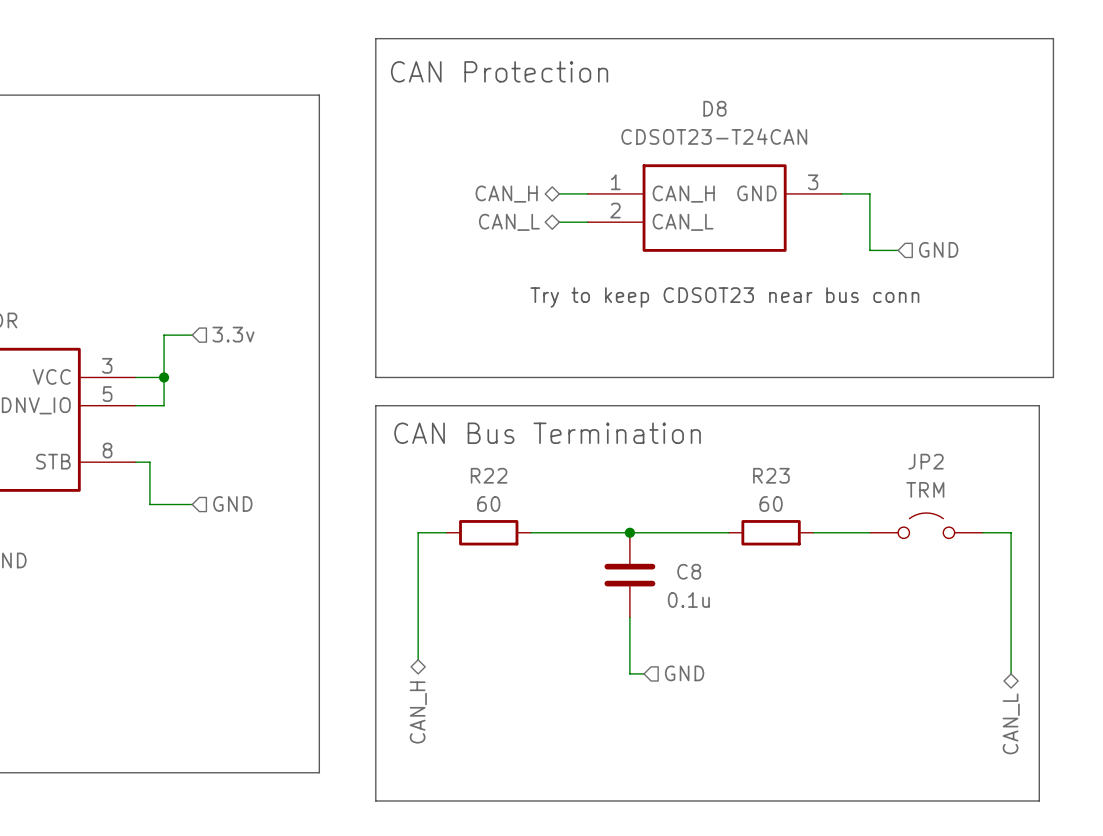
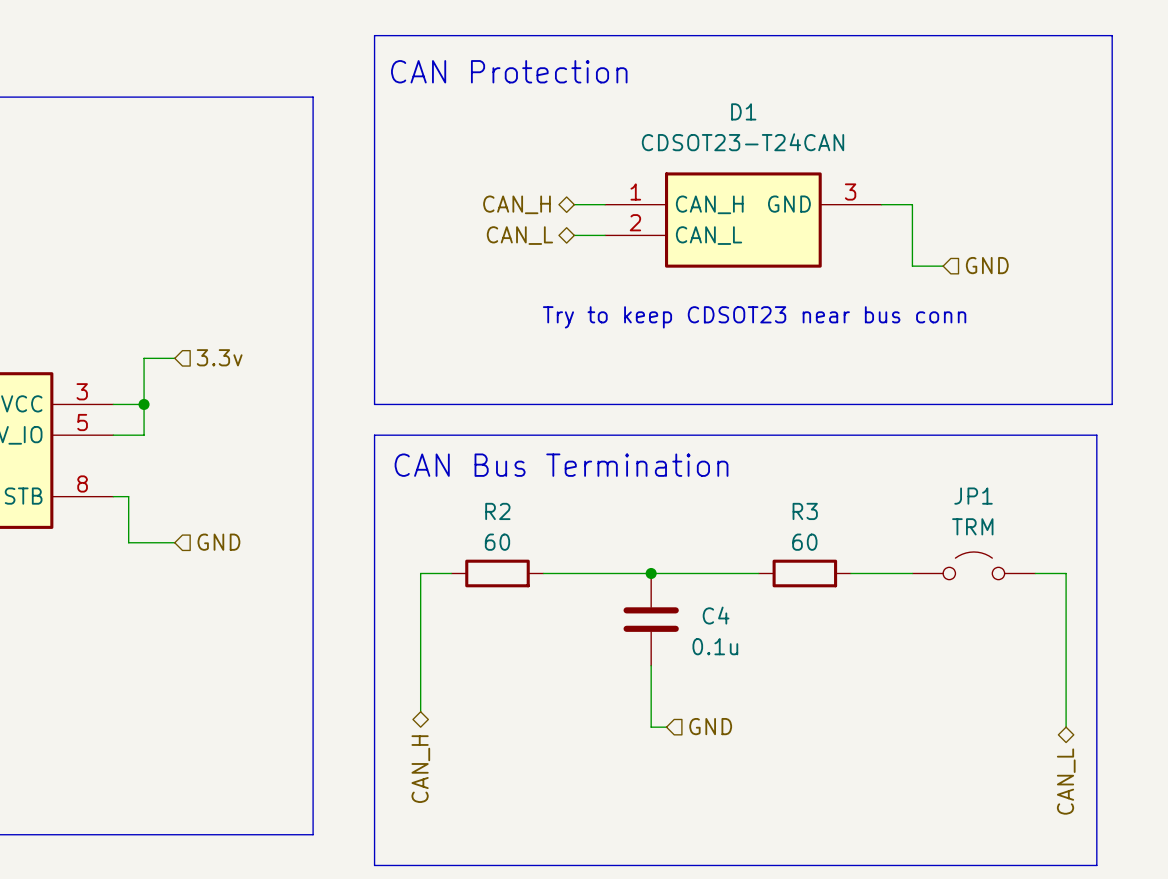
D8 name: D8 (714, 108) -> D1 (743, 111)
JP2 name: JP2 (926, 461) -> JP1 (973, 496)
R22 name: R22 (489, 475) -> R2 (497, 511)
R23 name: R23 (771, 475) -> R3 (805, 511)
C8 name: C8 (689, 571) -> C4 (716, 615)

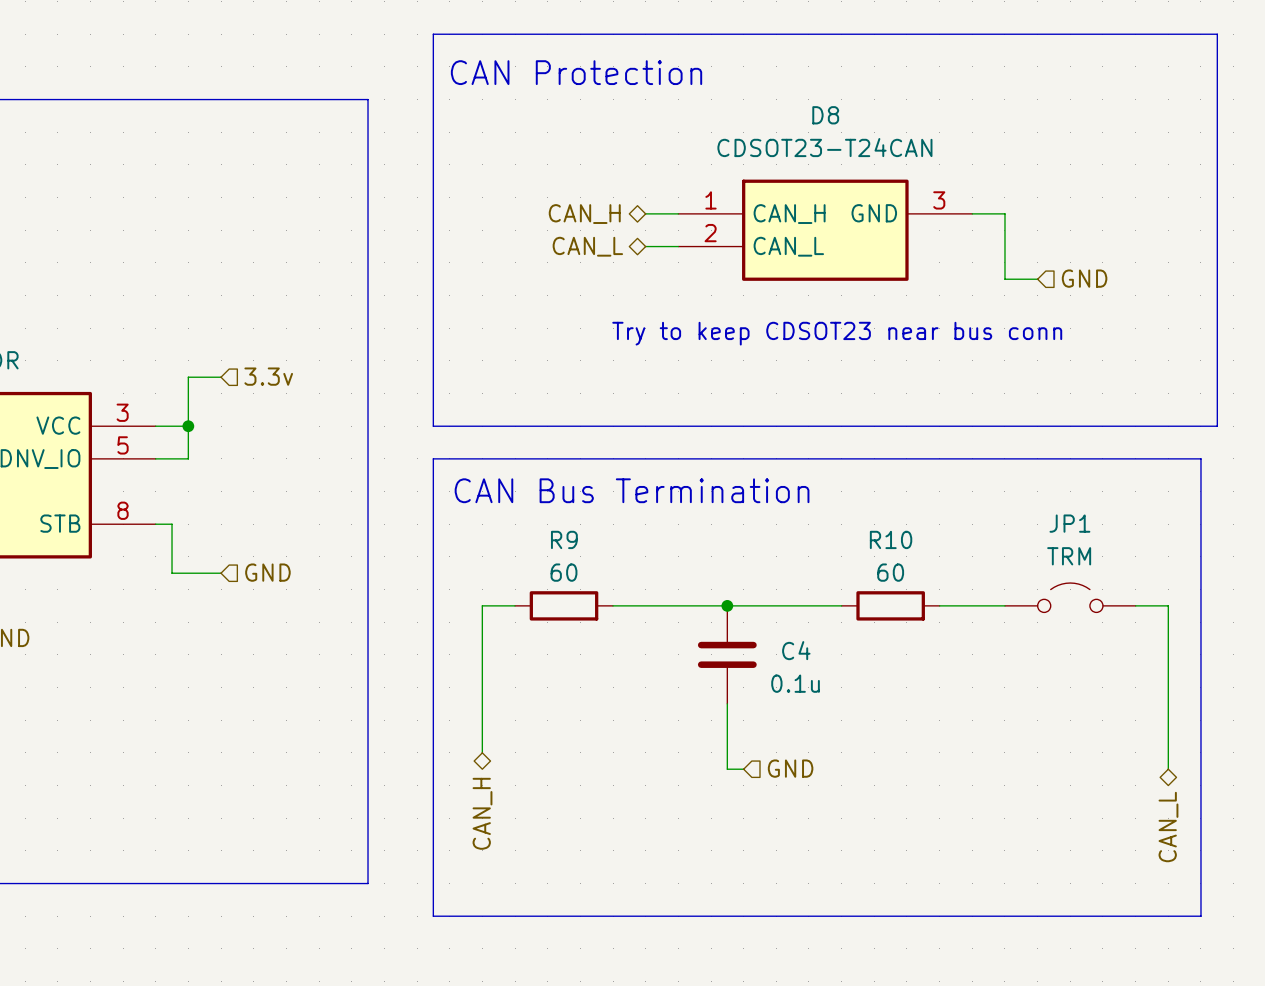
D1 name: D1 (743, 111) -> D8 (825, 115)
R2 name: R2 (497, 511) -> R9 (564, 539)
R3 name: R3 (805, 511) -> R10 (891, 539)

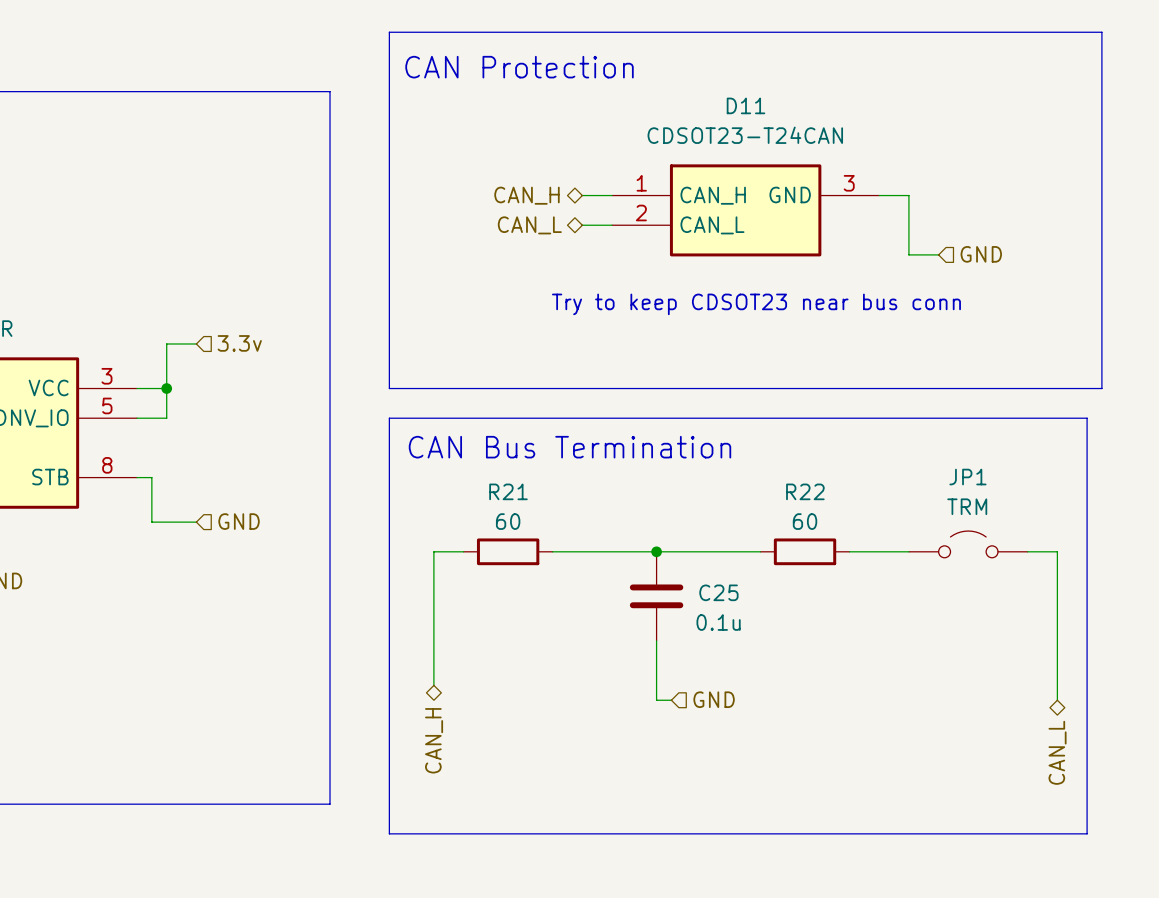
D8 name: D8 (825, 115) -> D11 (746, 105)
R9 name: R9 (564, 539) -> R21 (508, 491)
R10 name: R10 (891, 539) -> R22 (805, 491)
C4 name: C4 (796, 650) -> C25 (718, 592)

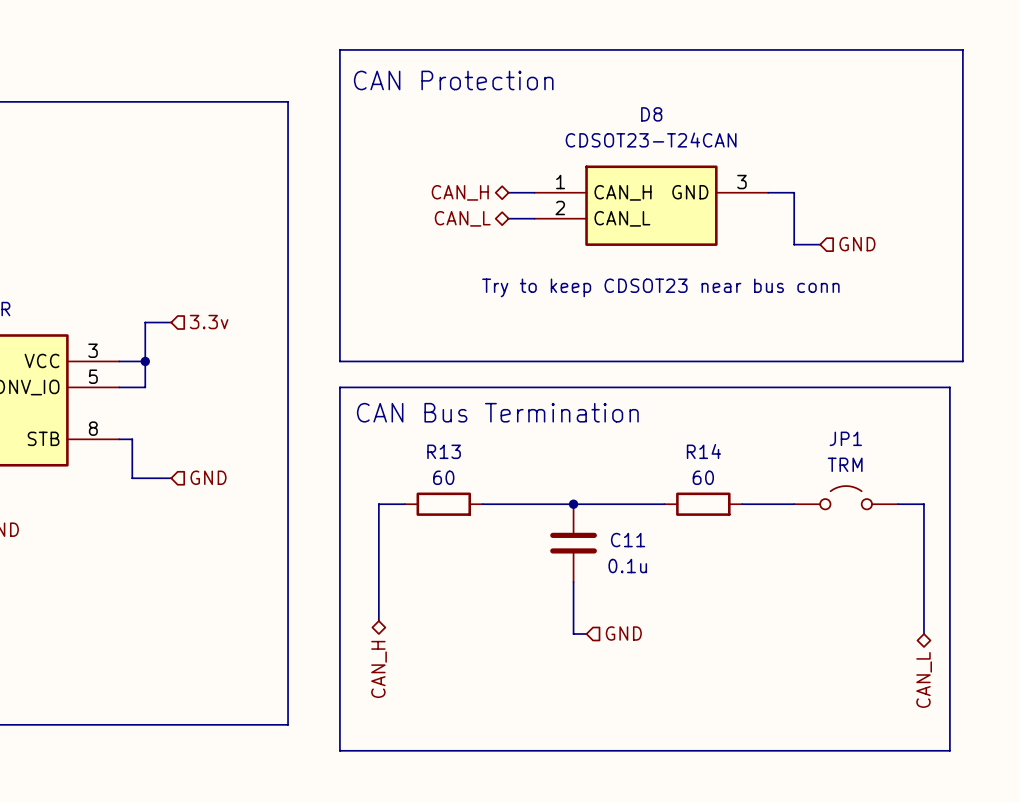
D11 name: D11 (746, 105) -> D8 (651, 114)
R21 name: R21 (508, 491) -> R13 (444, 451)
R22 name: R22 (805, 491) -> R14 (703, 451)
C25 name: C25 (718, 592) -> C11 (628, 540)

